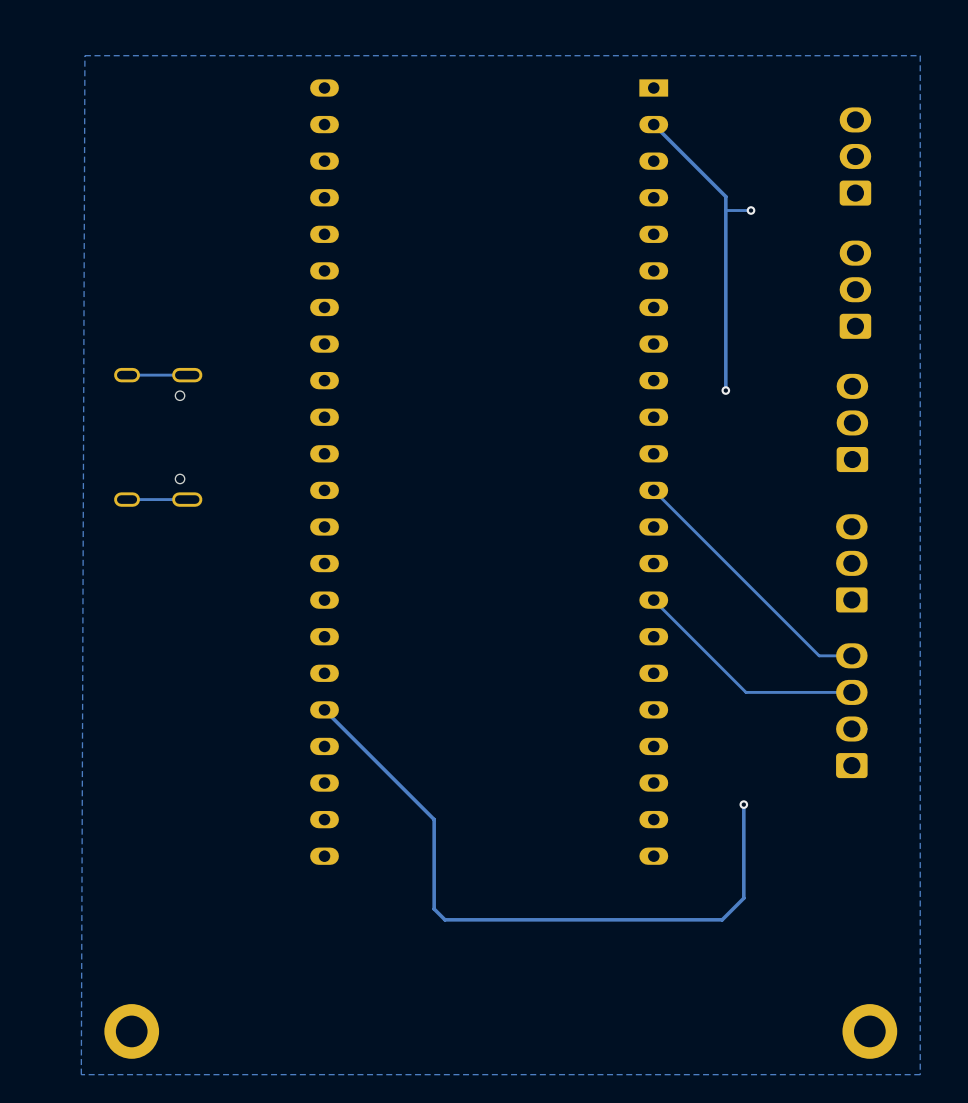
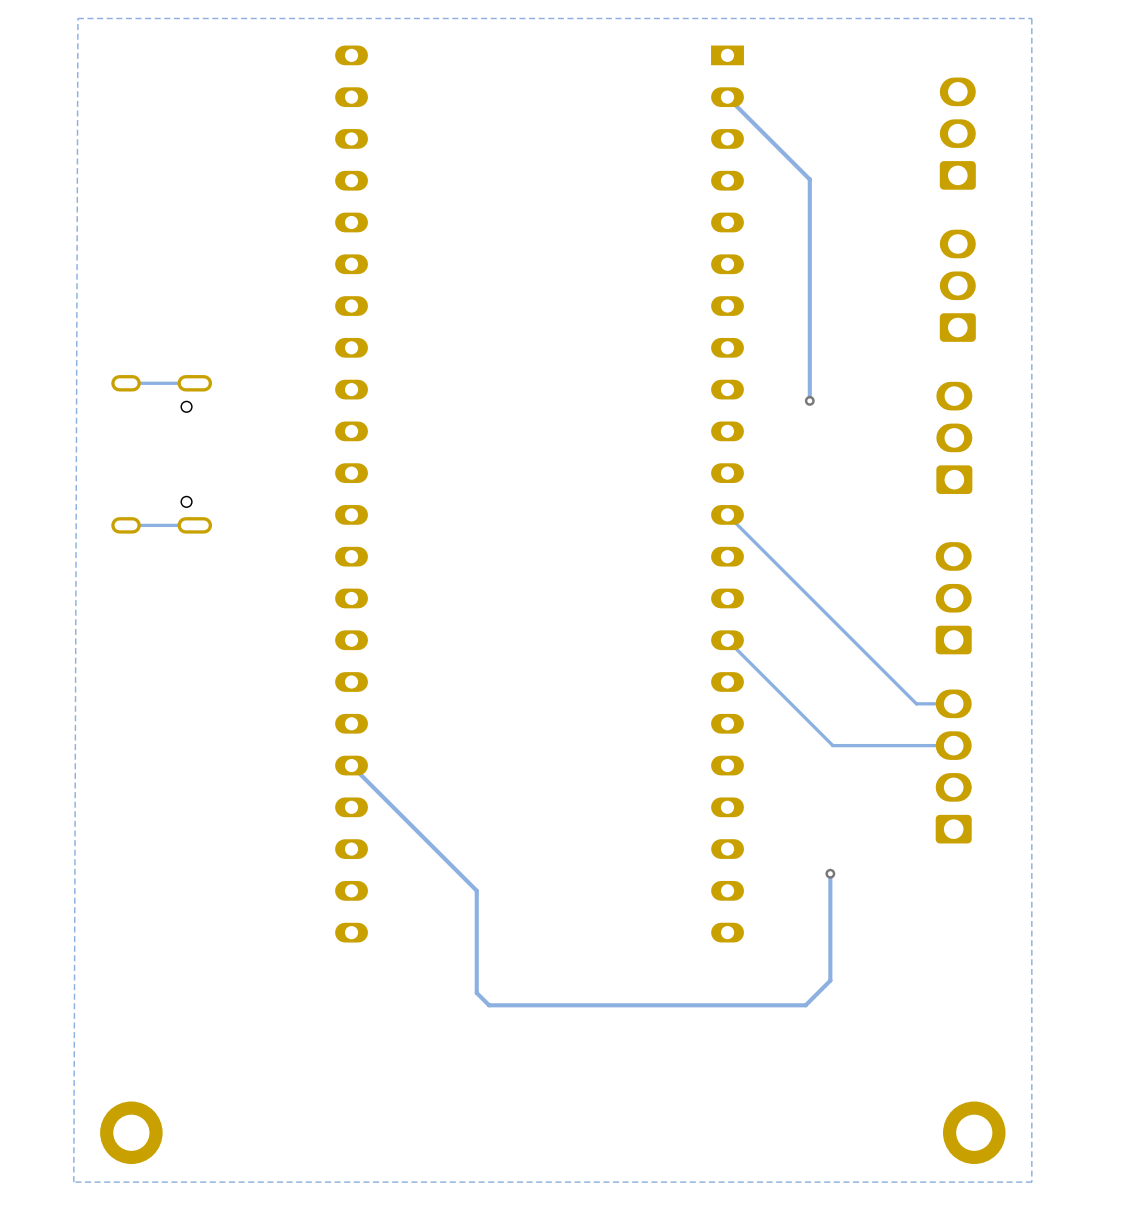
track: (751, 210) (725, 210) -> none
via: (751, 210) -> none

